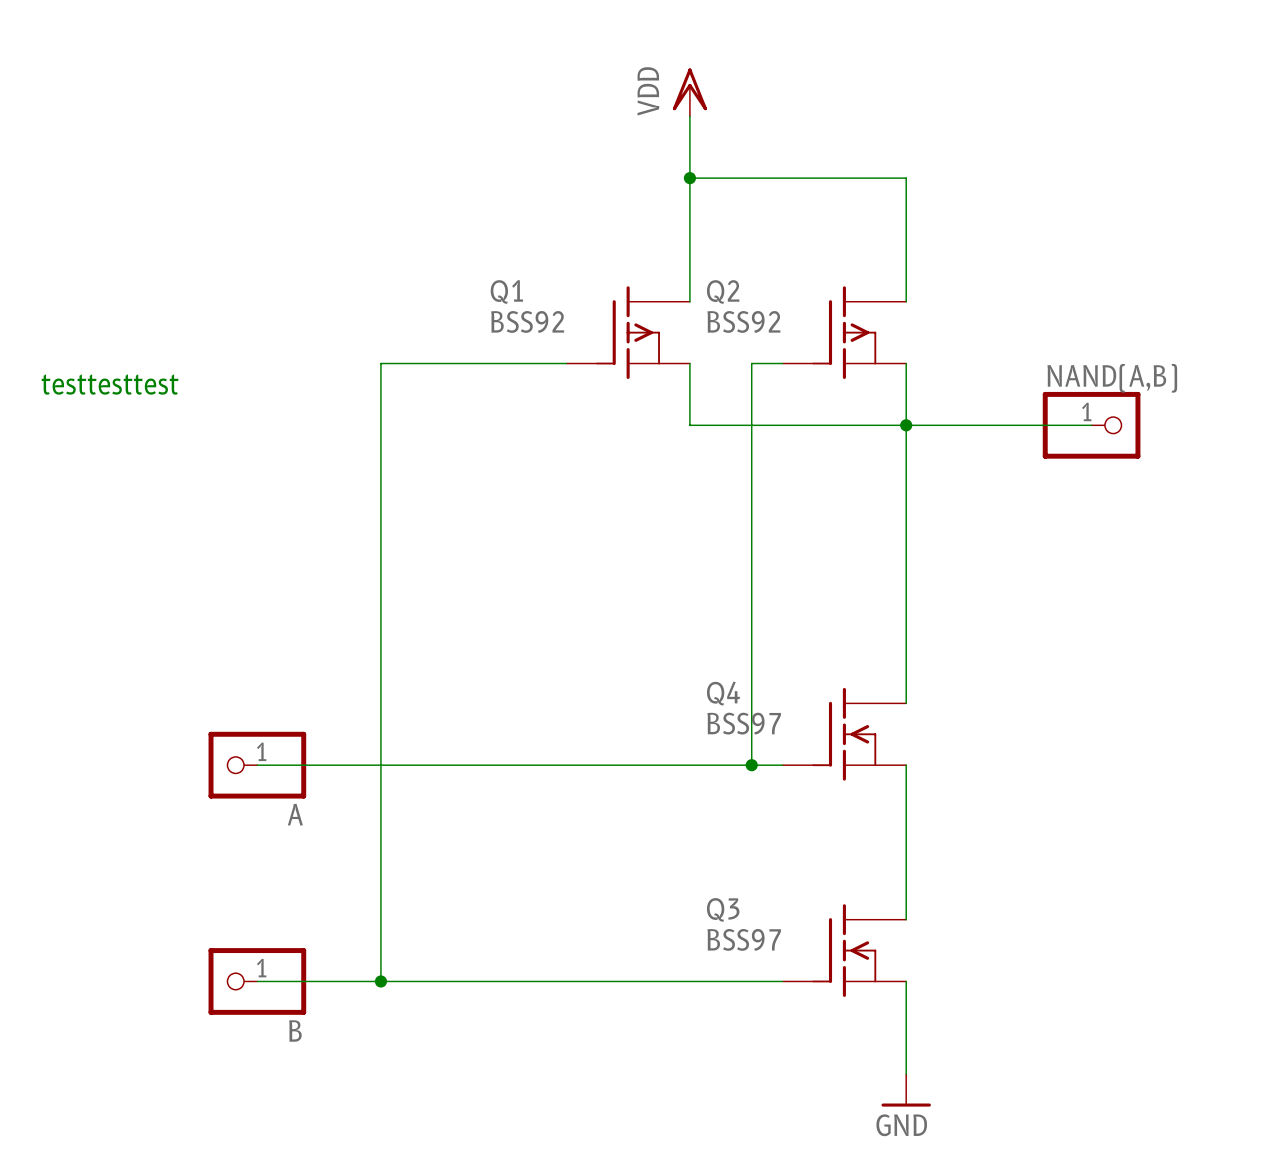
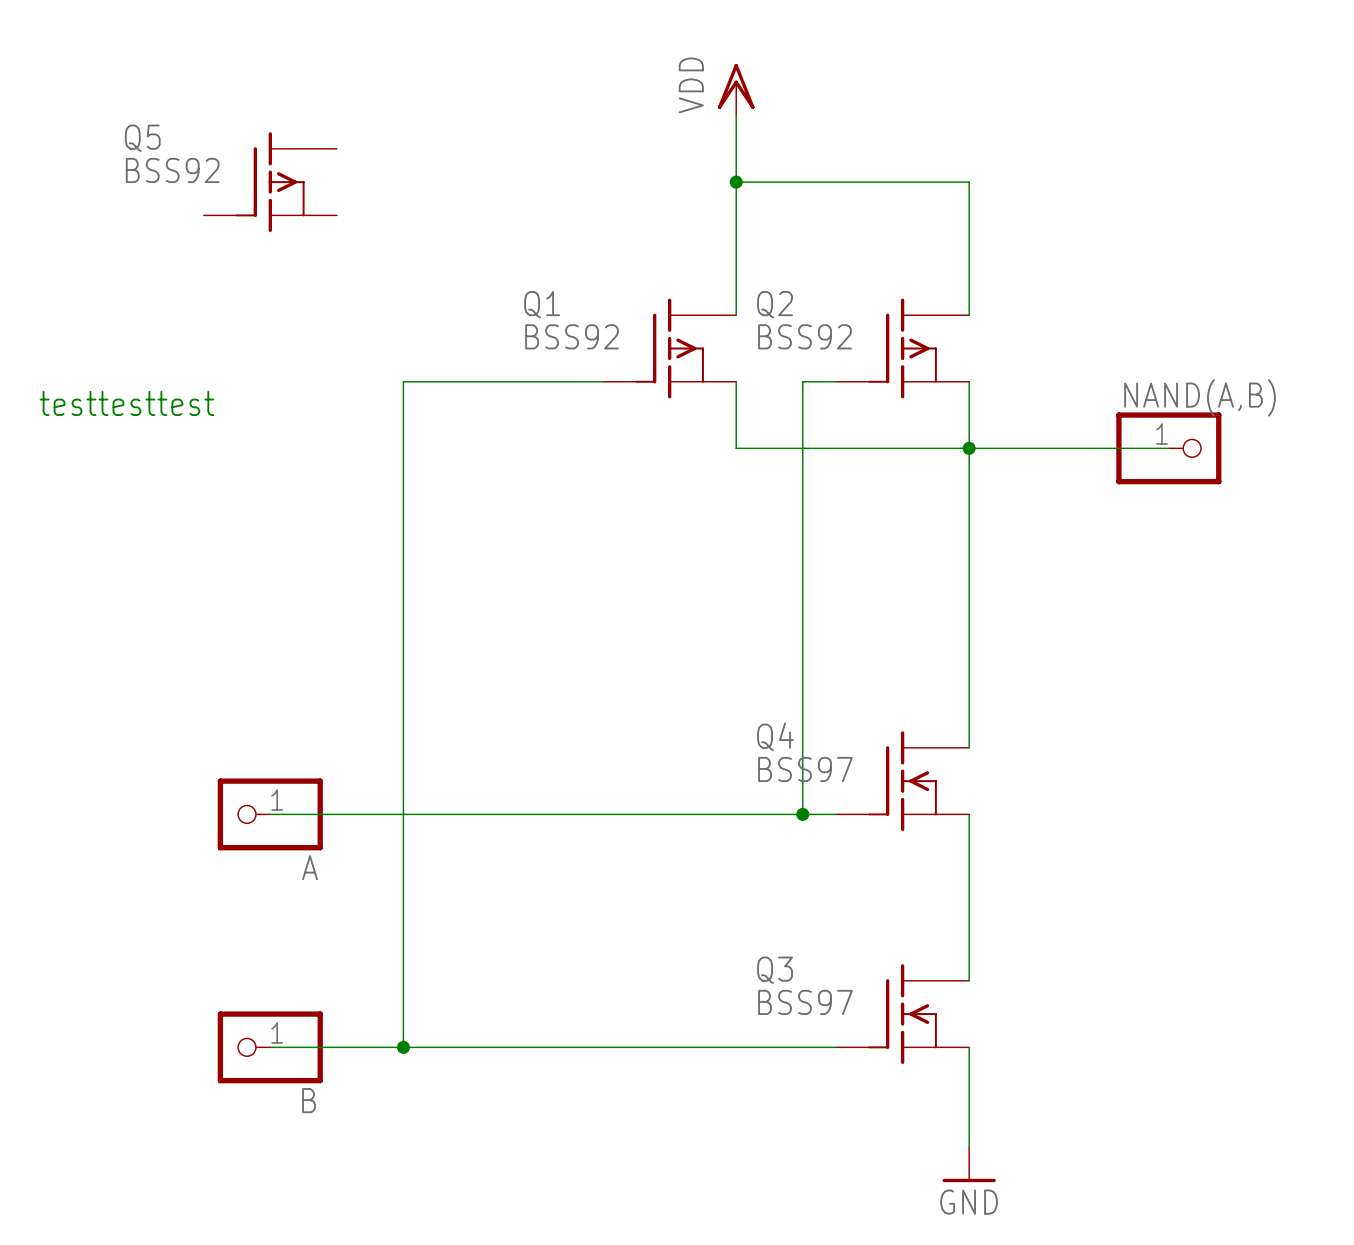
Q5: none -> BSS92 (270, 182)

